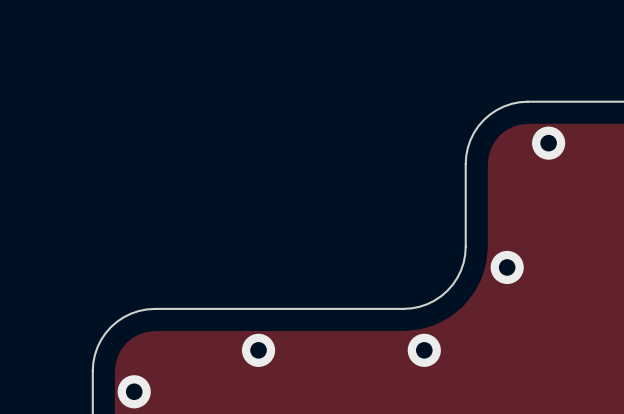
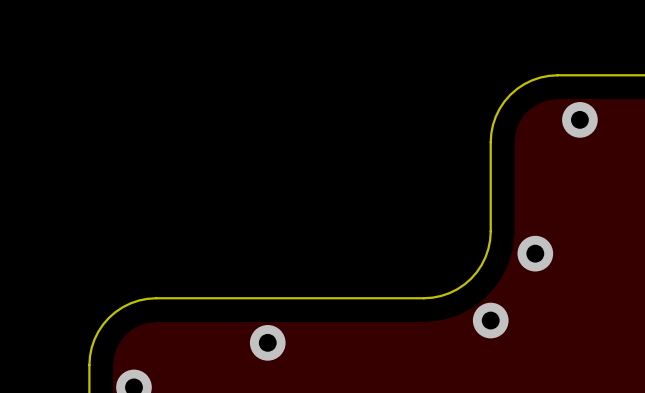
via position: (424, 350) -> (490, 320)

